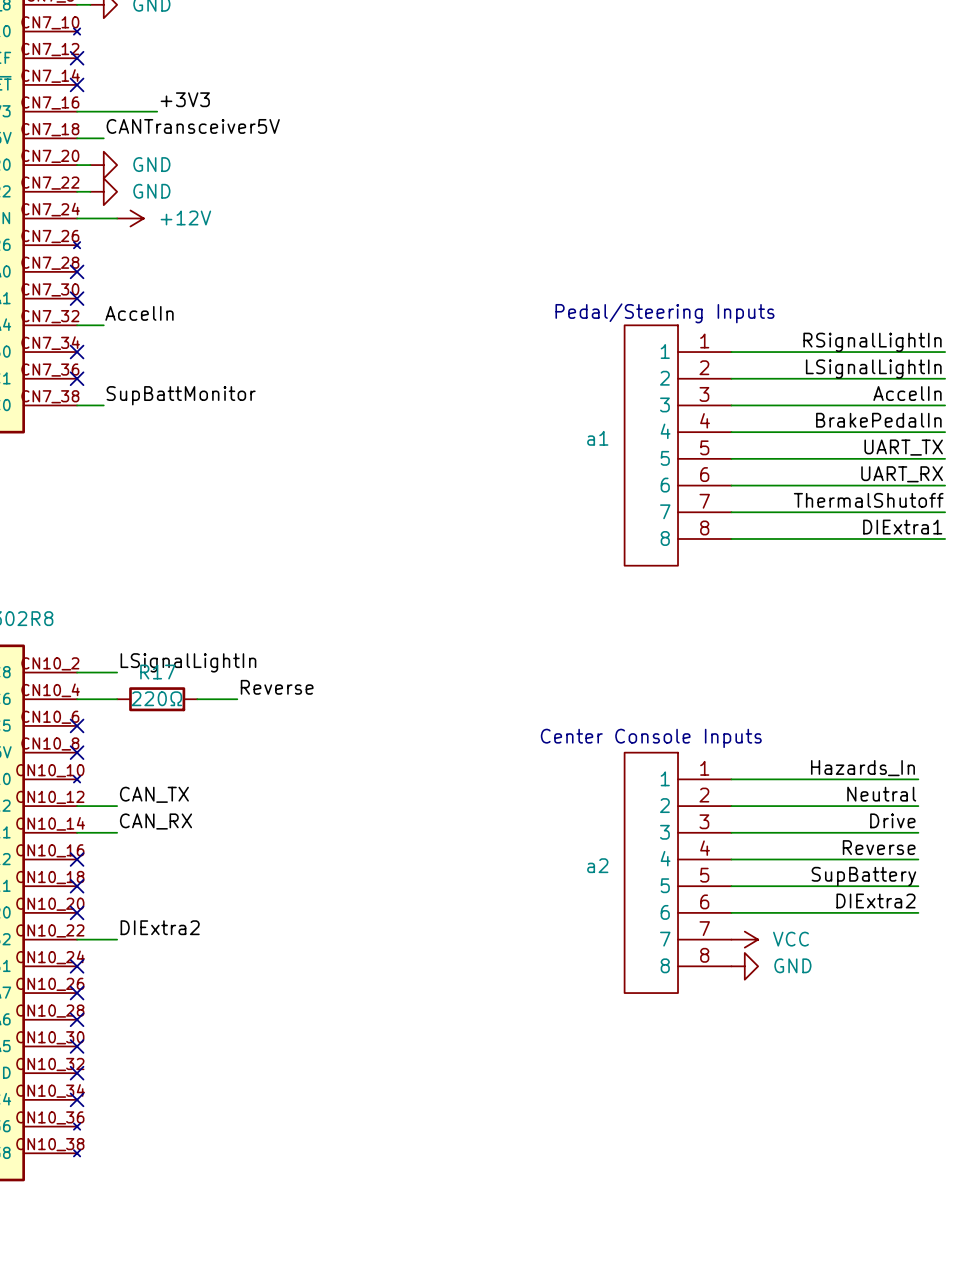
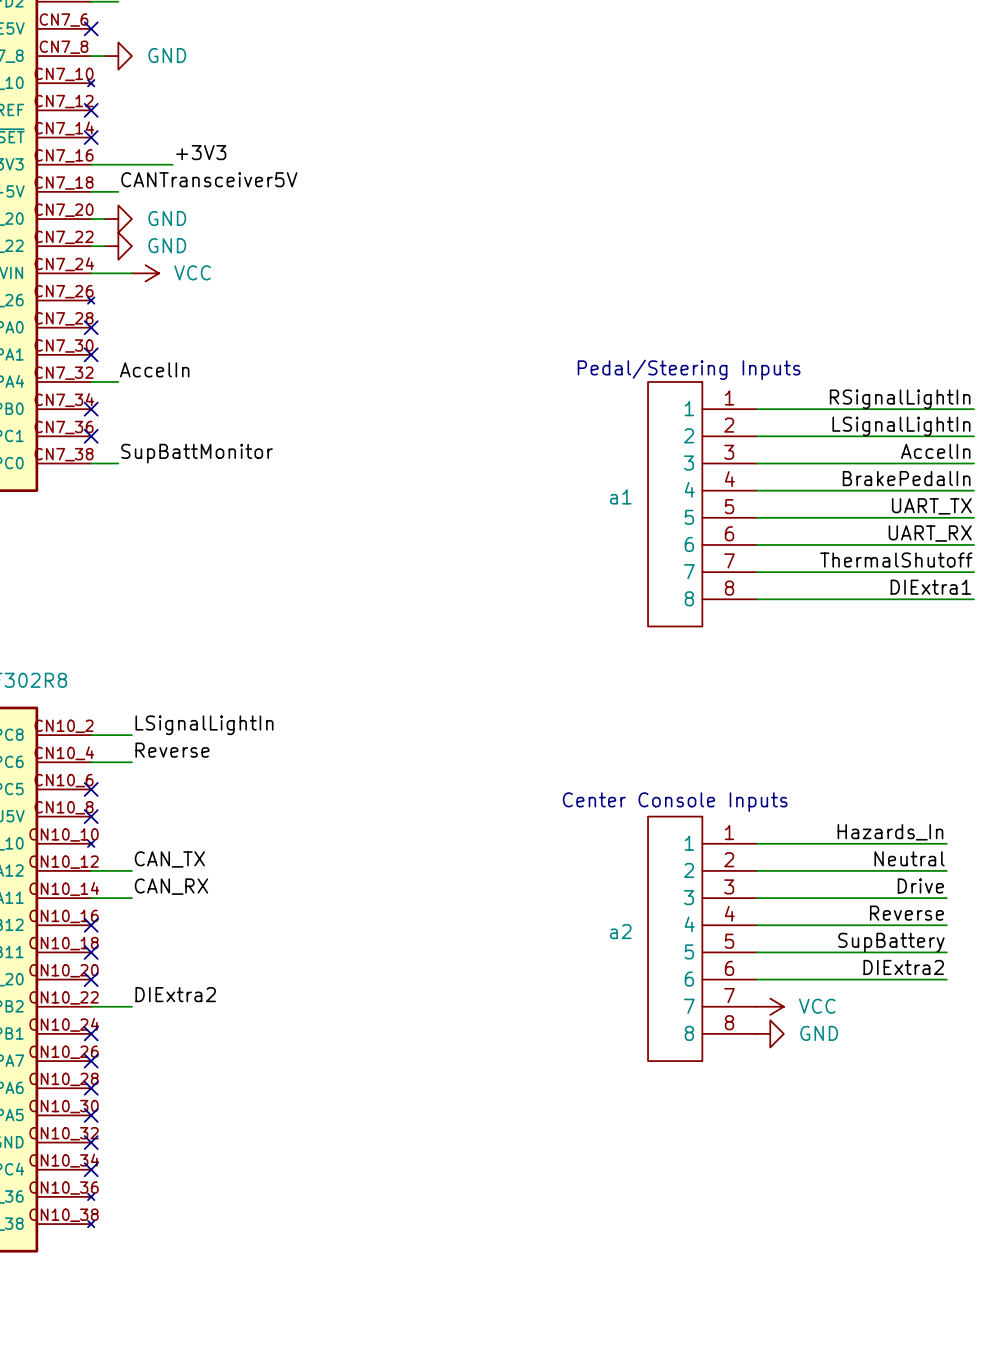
power symbol: +12V (130, 218) -> VCC (145, 273)
label position: Reverse (277, 687) -> Reverse (172, 750)
R17: 220Ω (157, 699) -> none
wire: (197, 699) (237, 699) -> none

